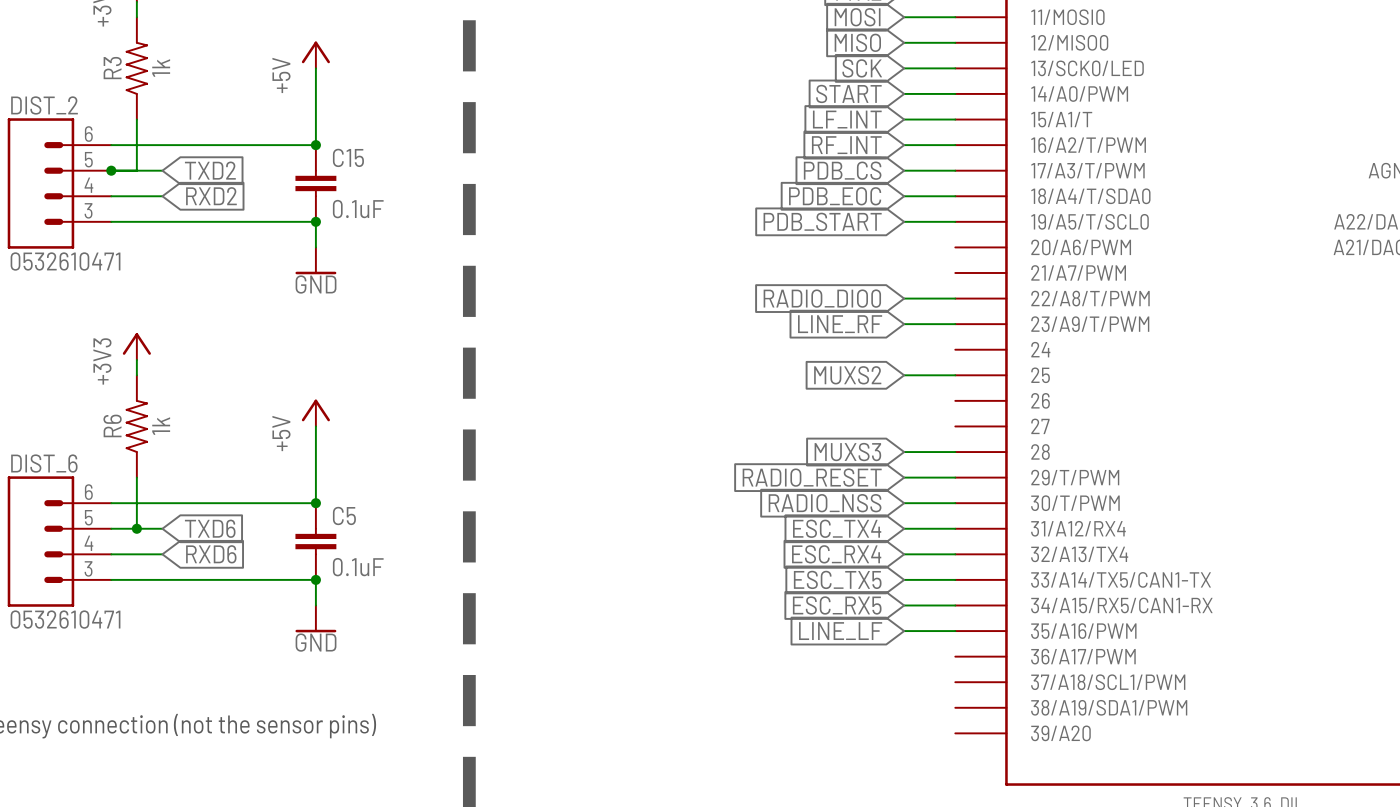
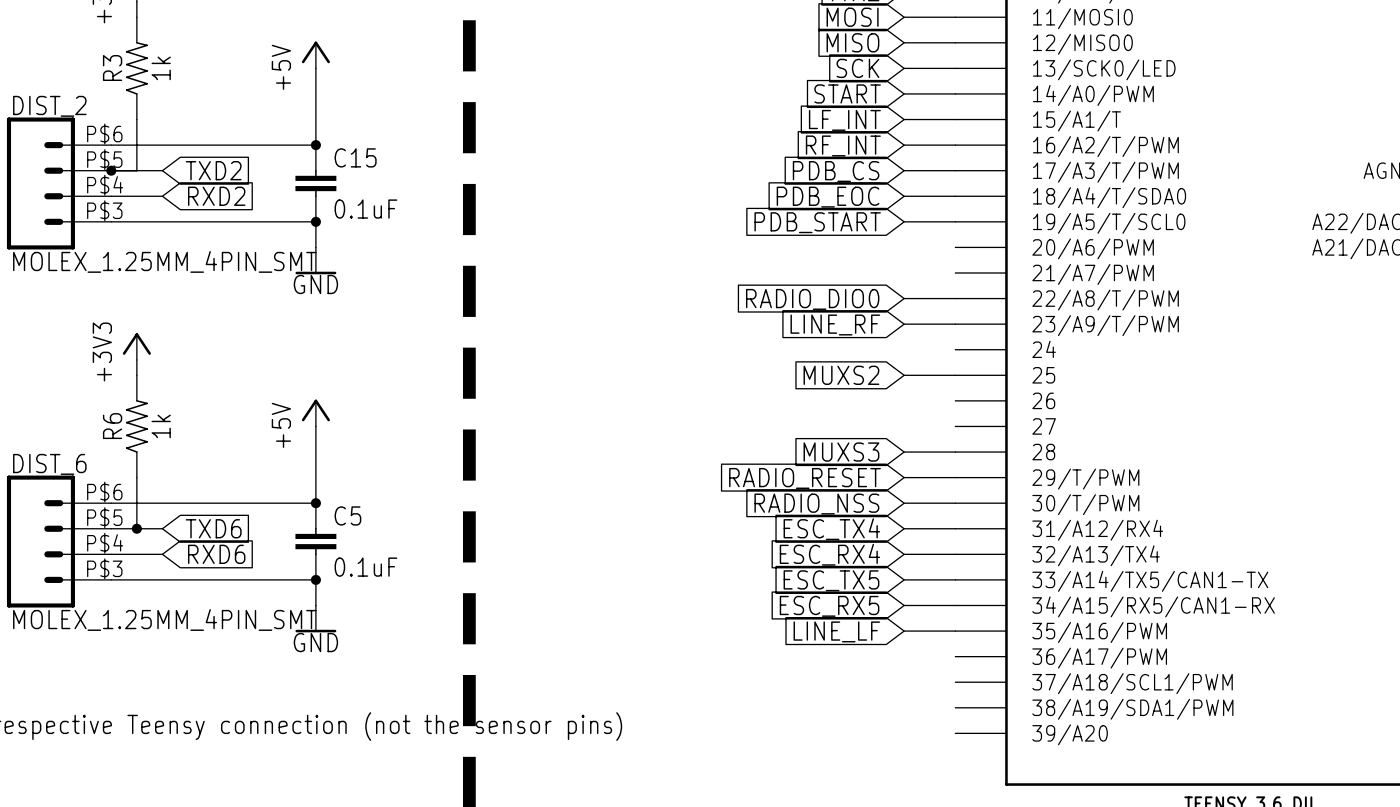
DIST_2 symbol: [7, 118, 112, 249] -> [6, 117, 112, 250]
DIST_2 value: 0532610471 (65, 261) -> MOLEX_1.25MM_4PIN_SMT (164, 261)
DIST_6 symbol: [7, 476, 112, 607] -> [6, 475, 112, 608]
DIST_6 value: 0532610471 (65, 619) -> MOLEX_1.25MM_4PIN_SMT (164, 619)

